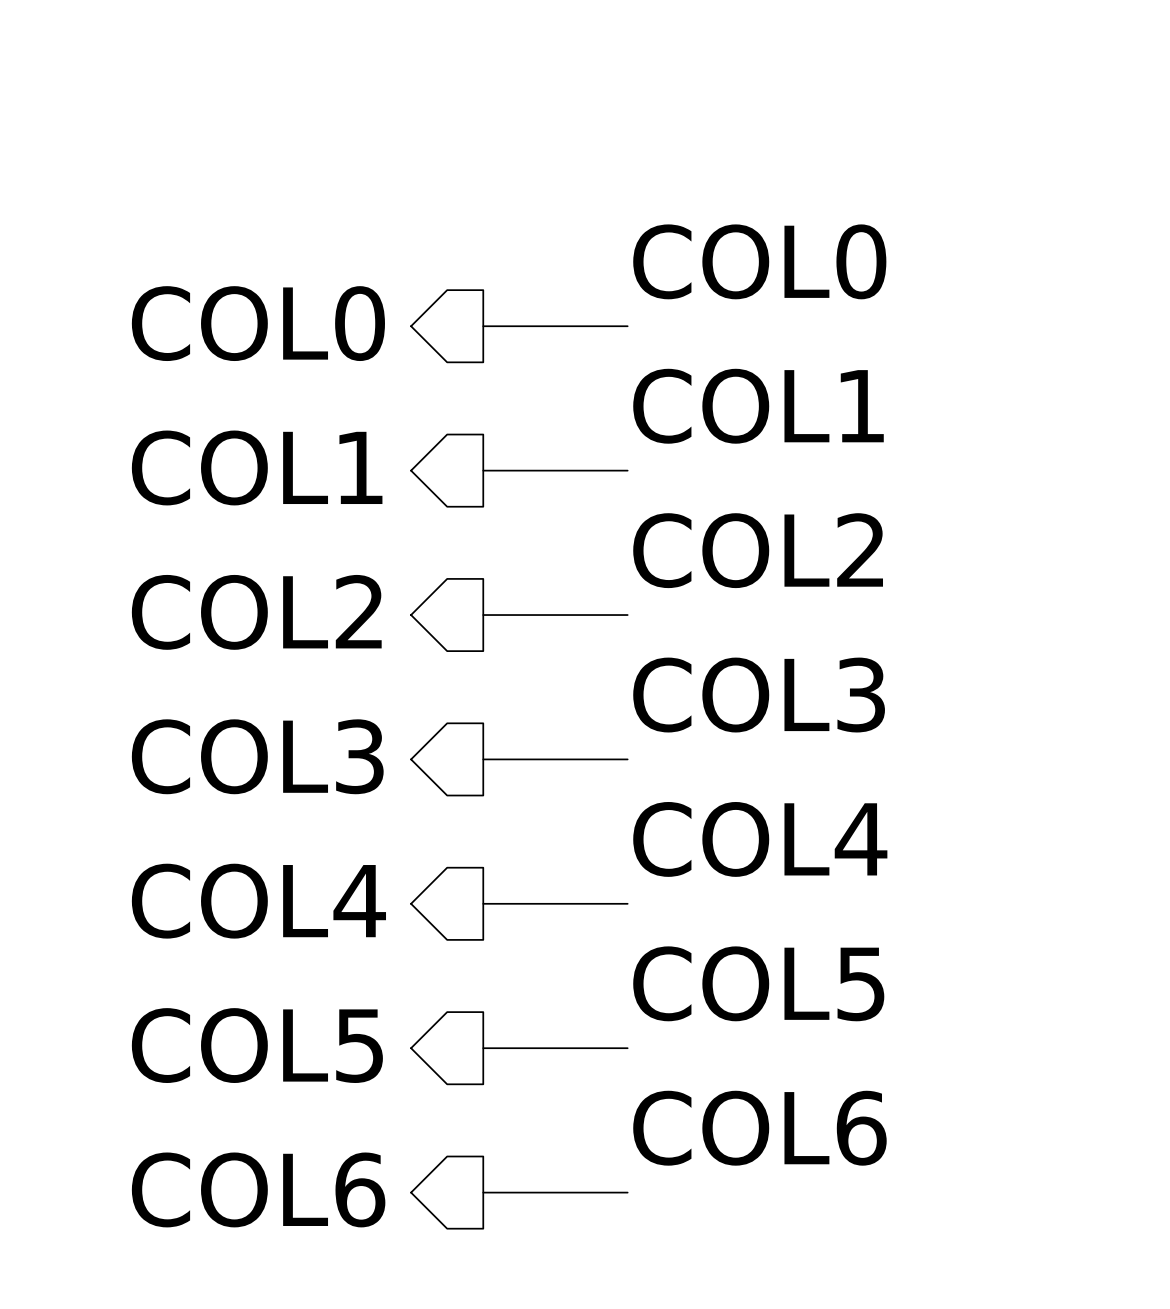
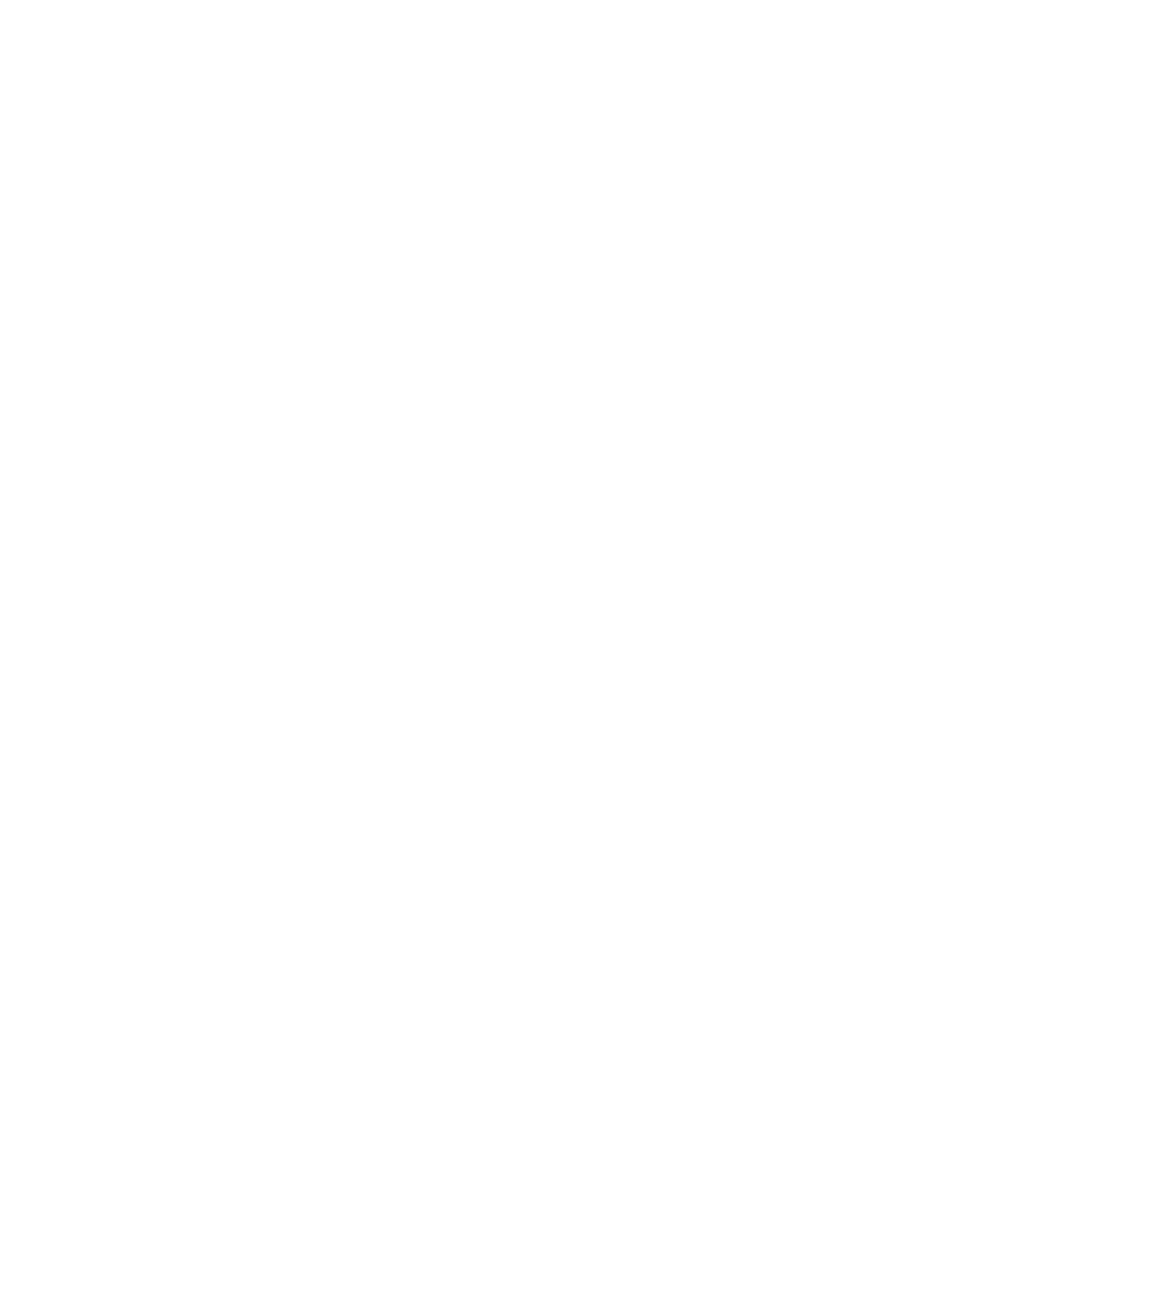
label: COL0 (759, 261) -> none
hierarchical label: COL0 (258, 323) -> none
wire: (483, 326) (627, 326) -> none
label: COL1 (758, 406) -> none
hierarchical label: COL1 (257, 467) -> none
wire: (483, 470) (627, 470) -> none
label: COL2 (758, 550) -> none
hierarchical label: COL2 (256, 612) -> none
wire: (483, 615) (627, 615) -> none
label: COL3 (759, 695) -> none
hierarchical label: COL3 (257, 756) -> none
wire: (483, 759) (627, 759) -> none
label: COL4 (760, 839) -> none
hierarchical label: COL4 (258, 901) -> none
wire: (483, 903) (627, 903) -> none
label: COL5 (758, 983) -> none
hierarchical label: COL5 (257, 1045) -> none
wire: (483, 1048) (627, 1048) -> none
label: COL6 (759, 1128) -> none
hierarchical label: COL6 (258, 1189) -> none
wire: (483, 1192) (627, 1192) -> none

